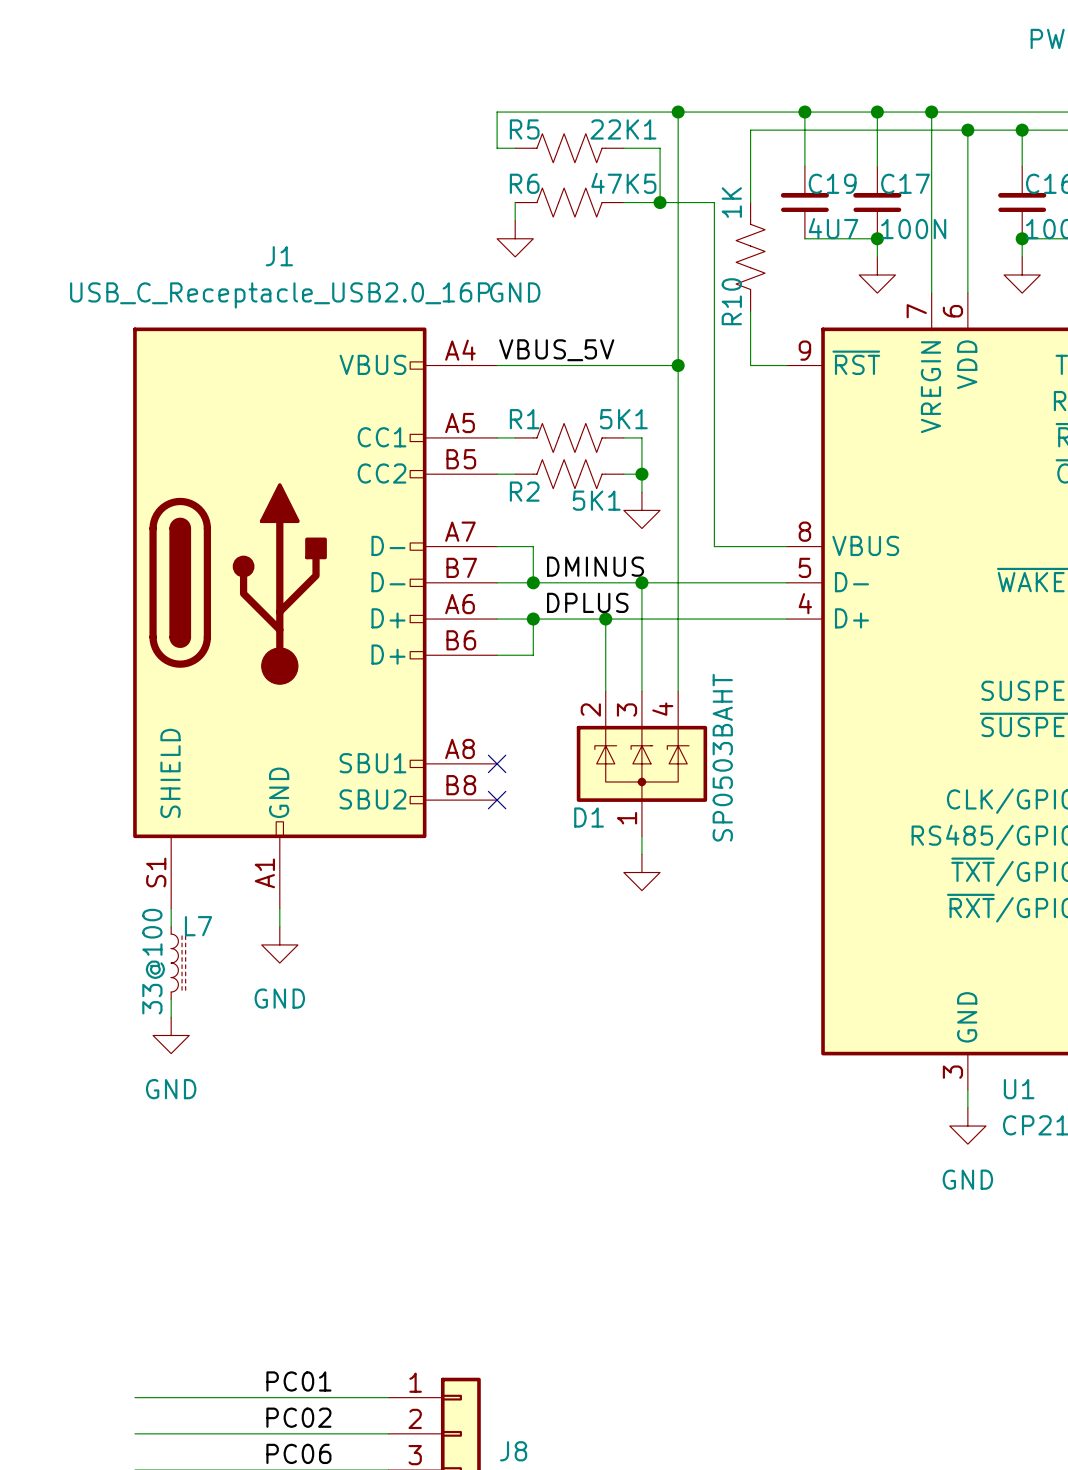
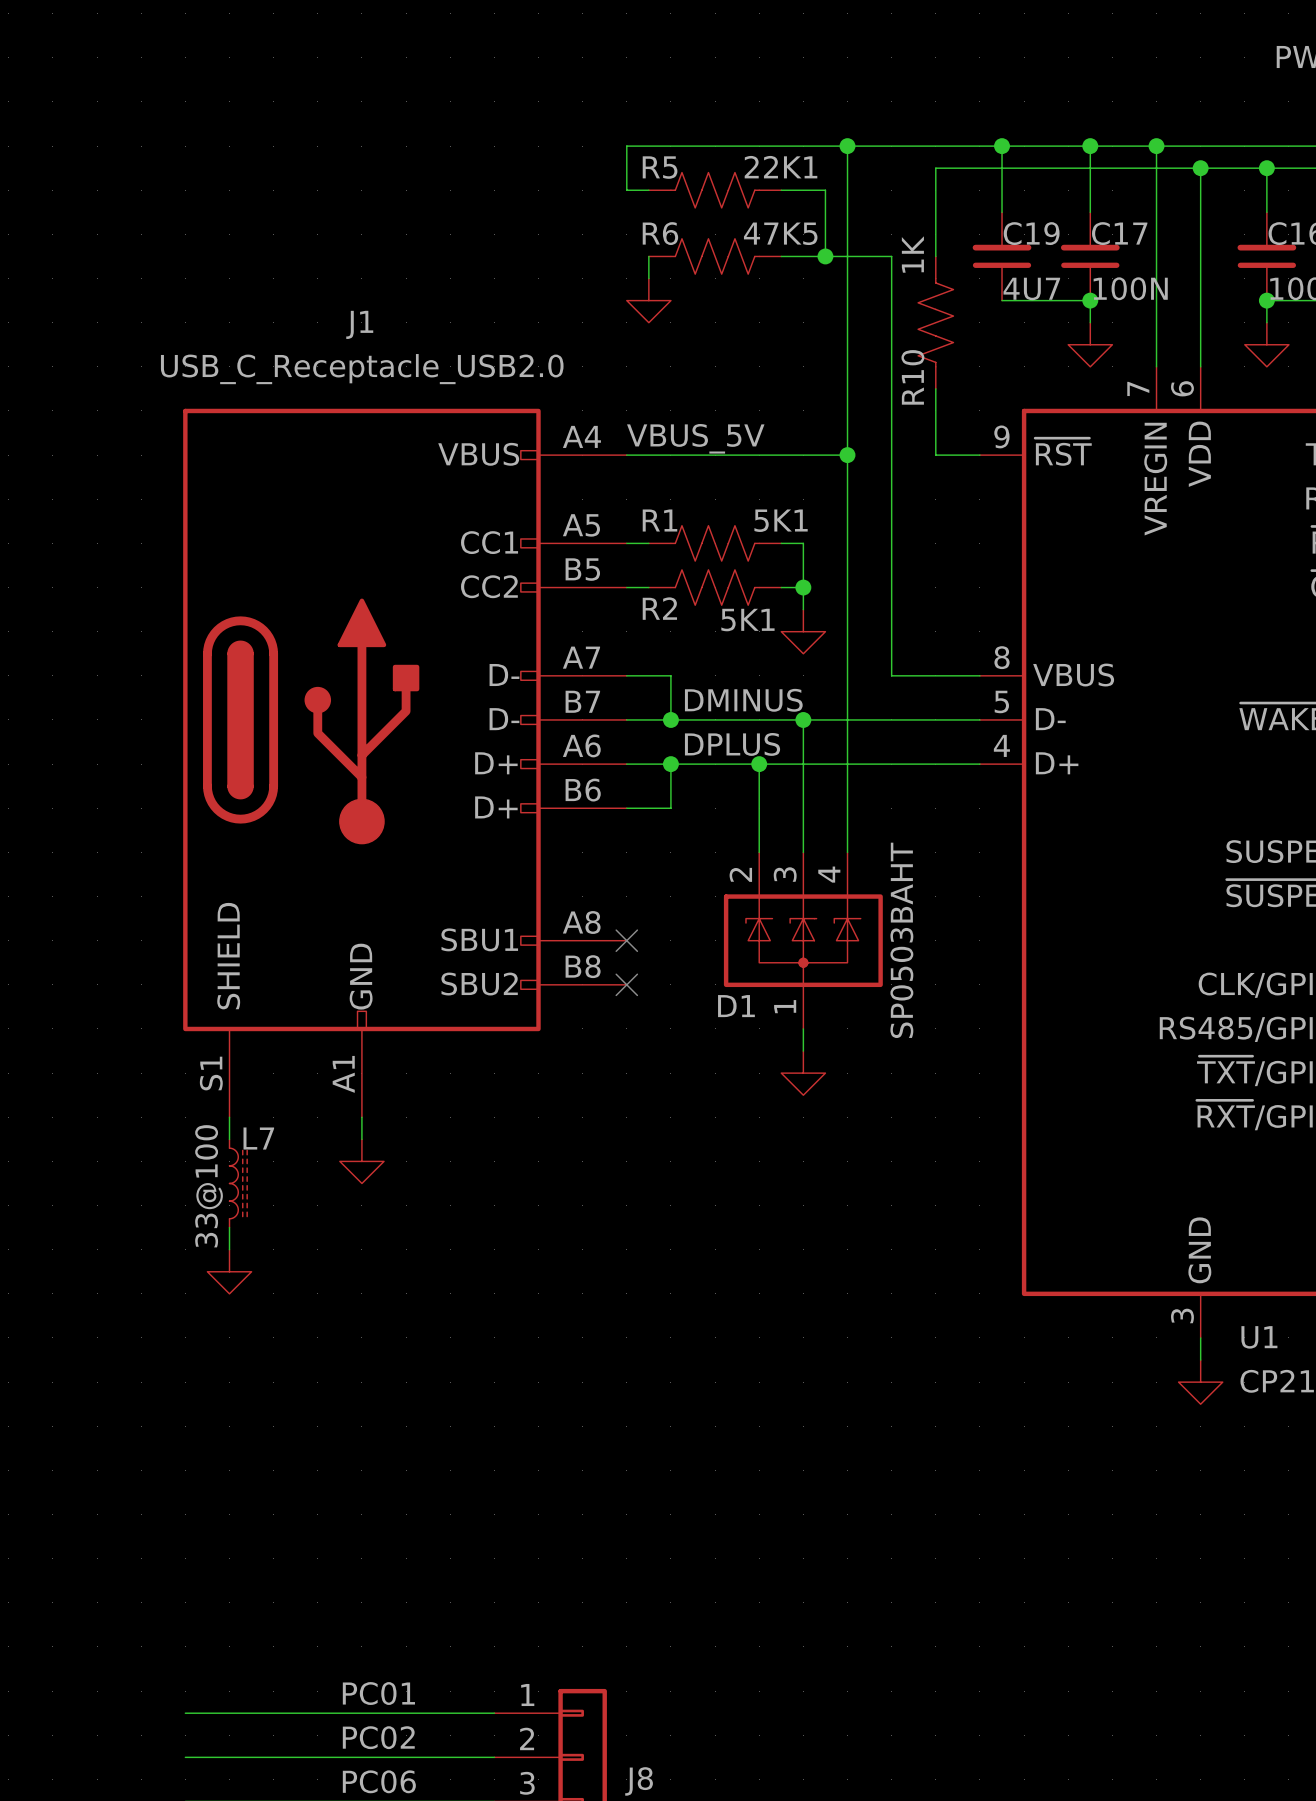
power symbol text: GND (515, 292) -> none
J1 value: USB_C_Receptacle_USB2.0_16P (280, 295) -> USB_C_Receptacle_USB2.0 (362, 369)
power symbol text: GND (279, 998) -> none
power symbol text: GND (171, 1089) -> none
power symbol text: GND (967, 1179) -> none

